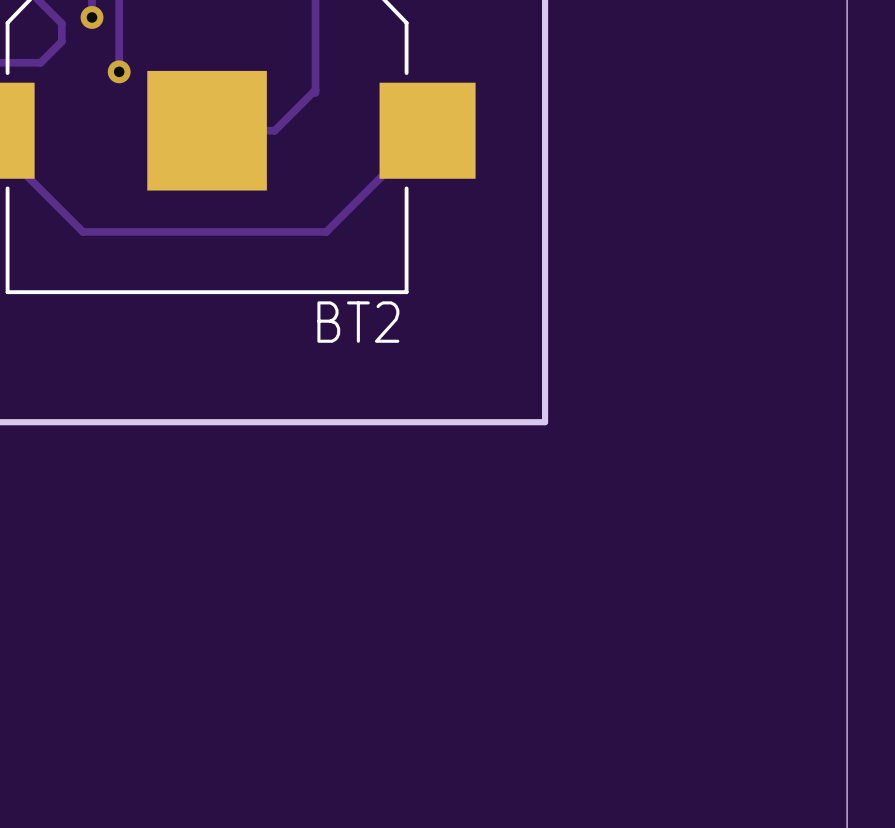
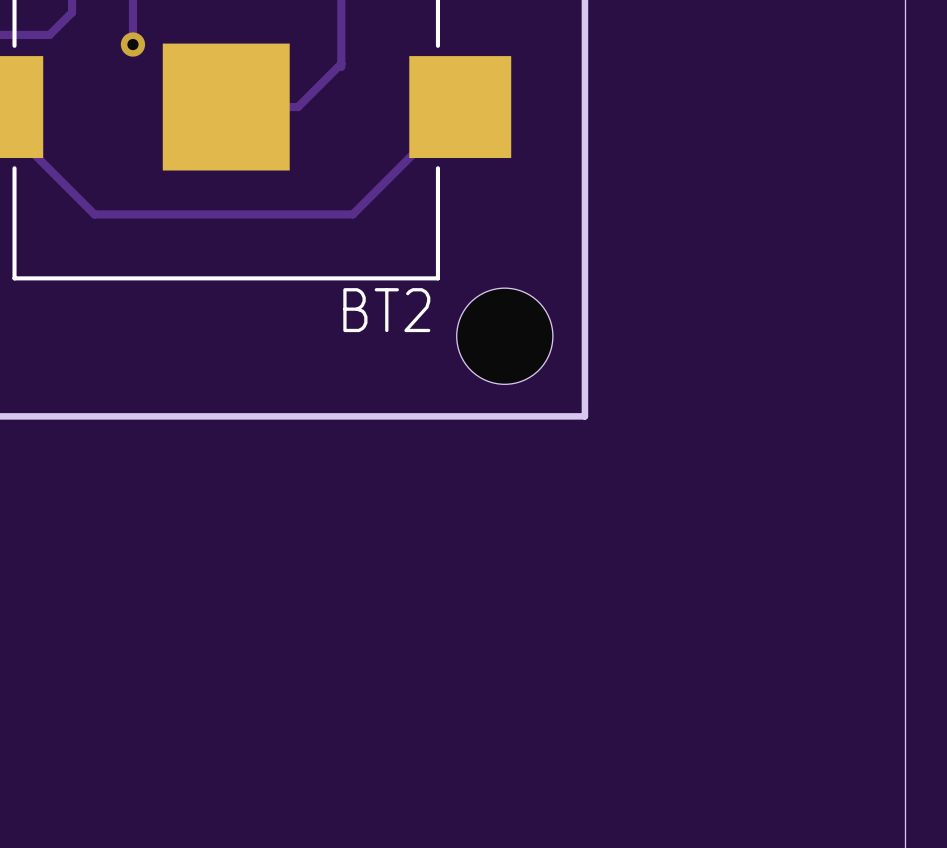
hole: none -> (504, 336)

